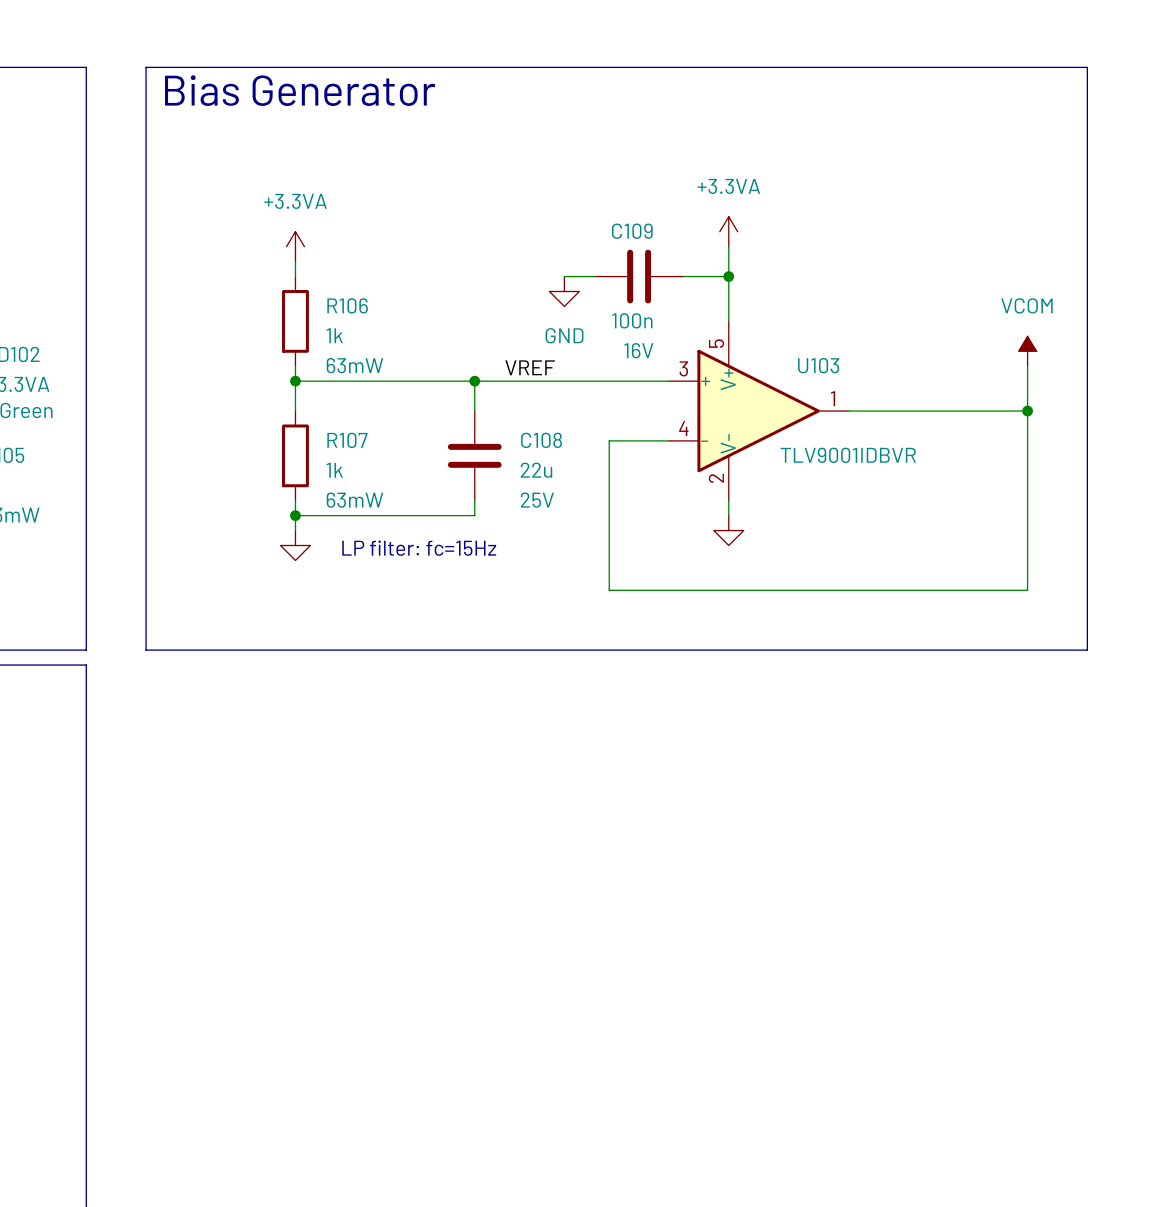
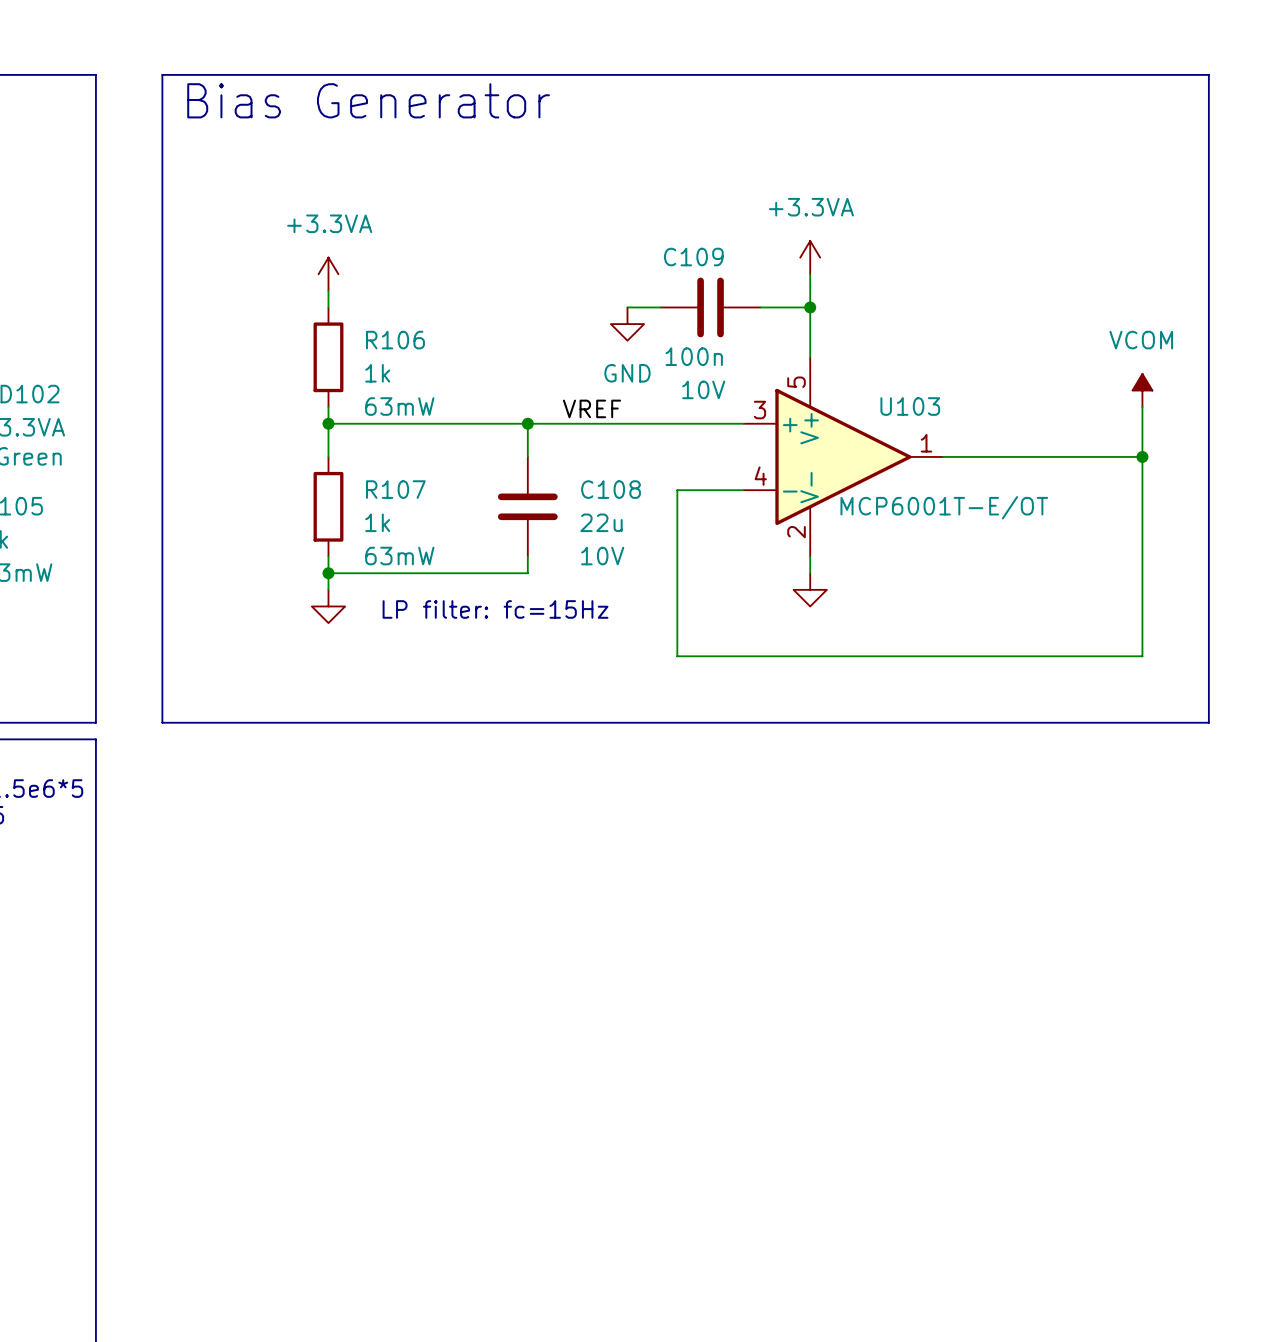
C109 text: 16V (638, 350) -> 10V (703, 389)
U103 value: TLV9001IDBVR (848, 455) -> MCP6001T-E/OT (944, 507)
C108 text: 25V (537, 500) -> 10V (602, 556)

